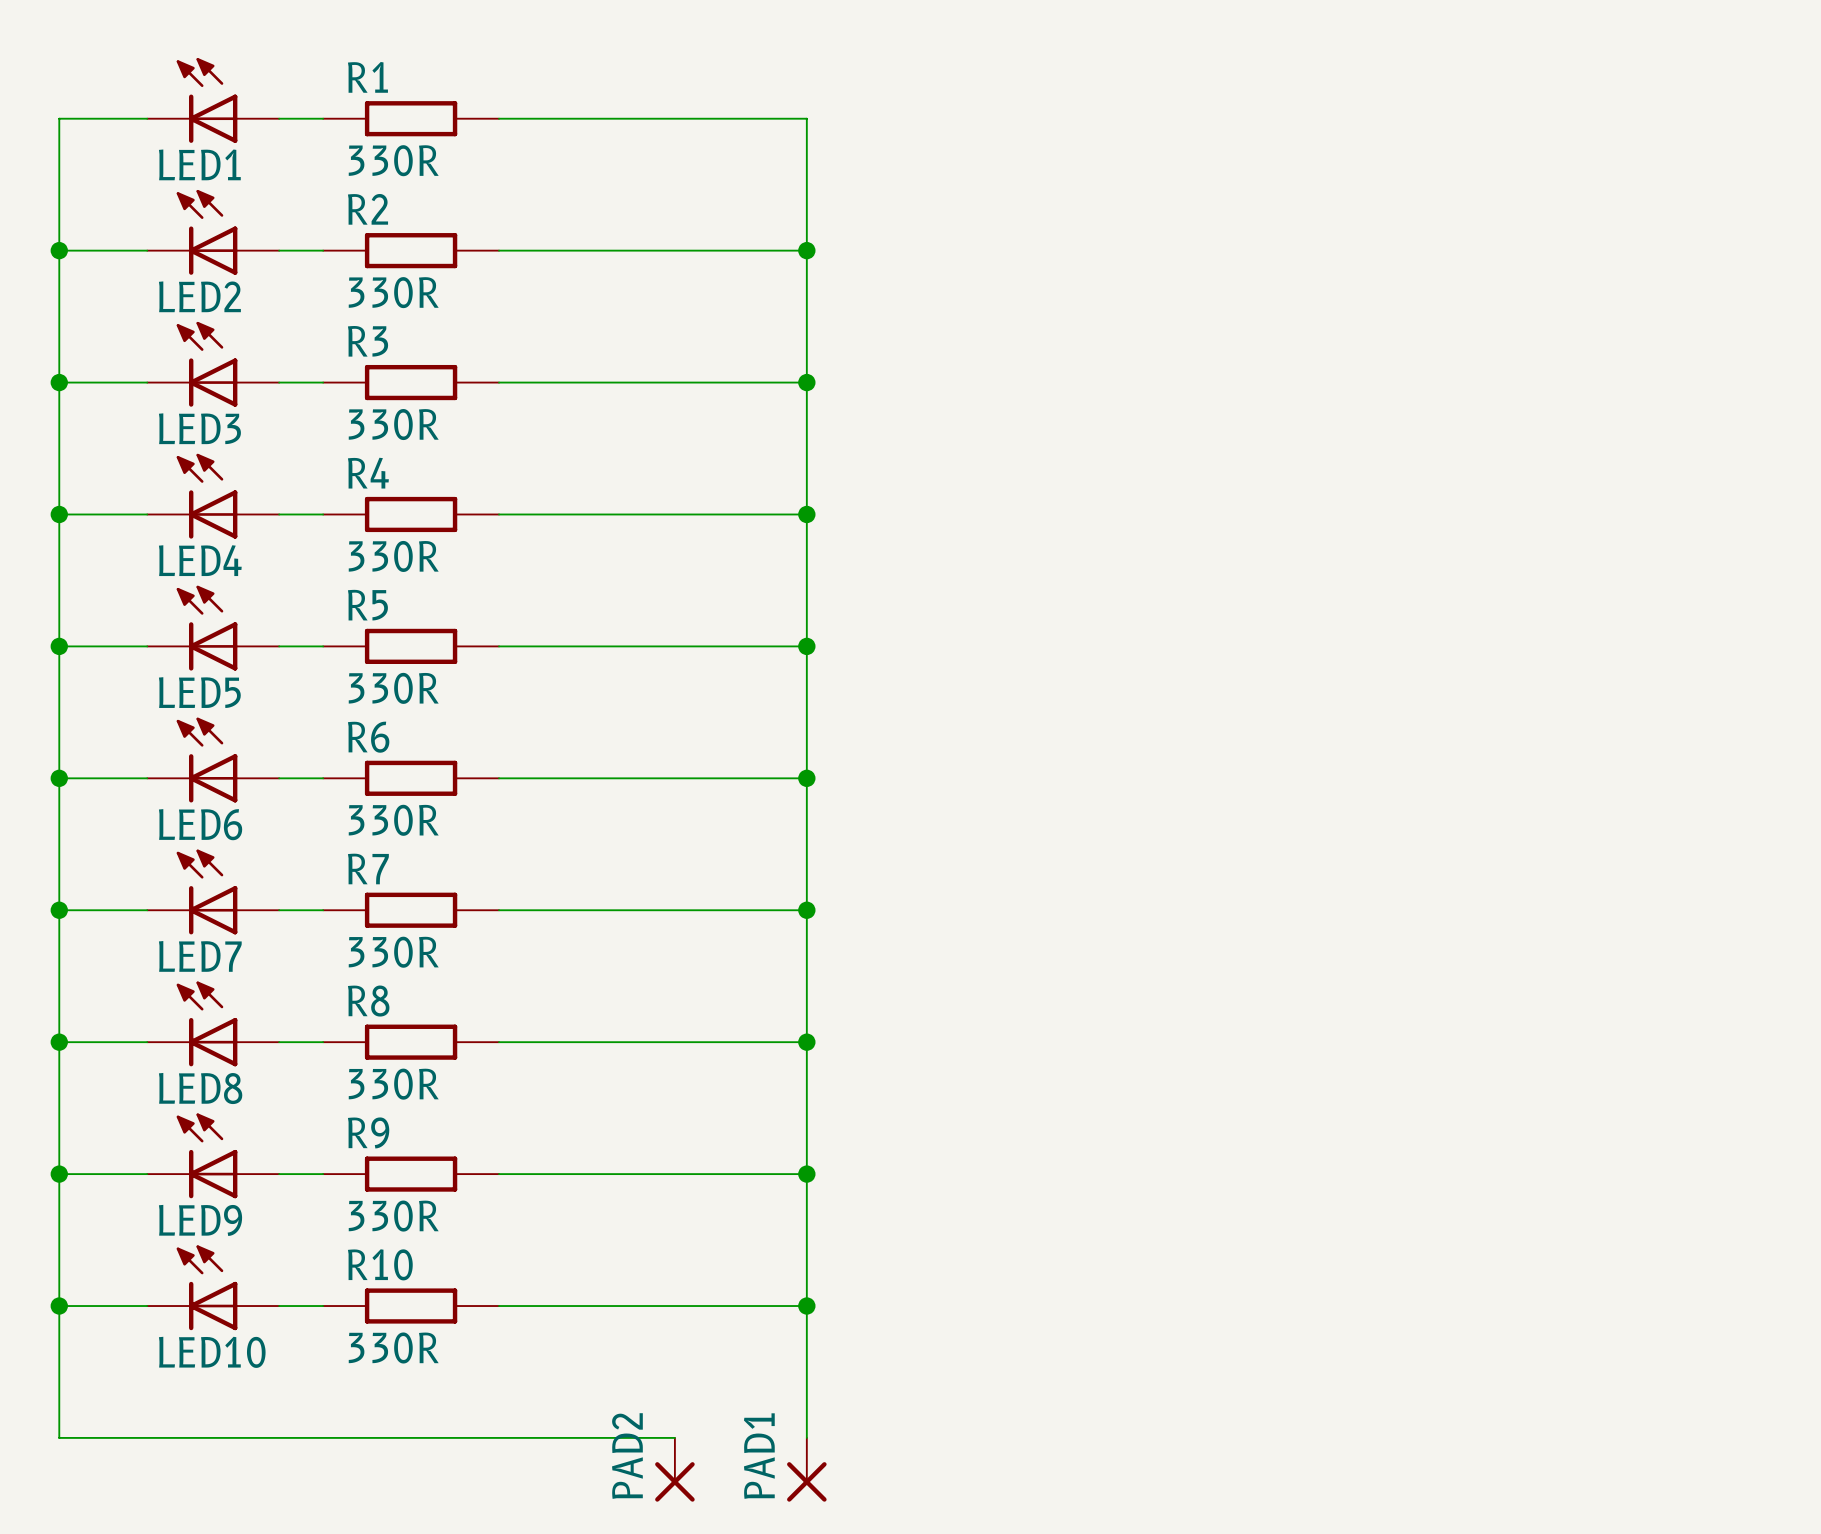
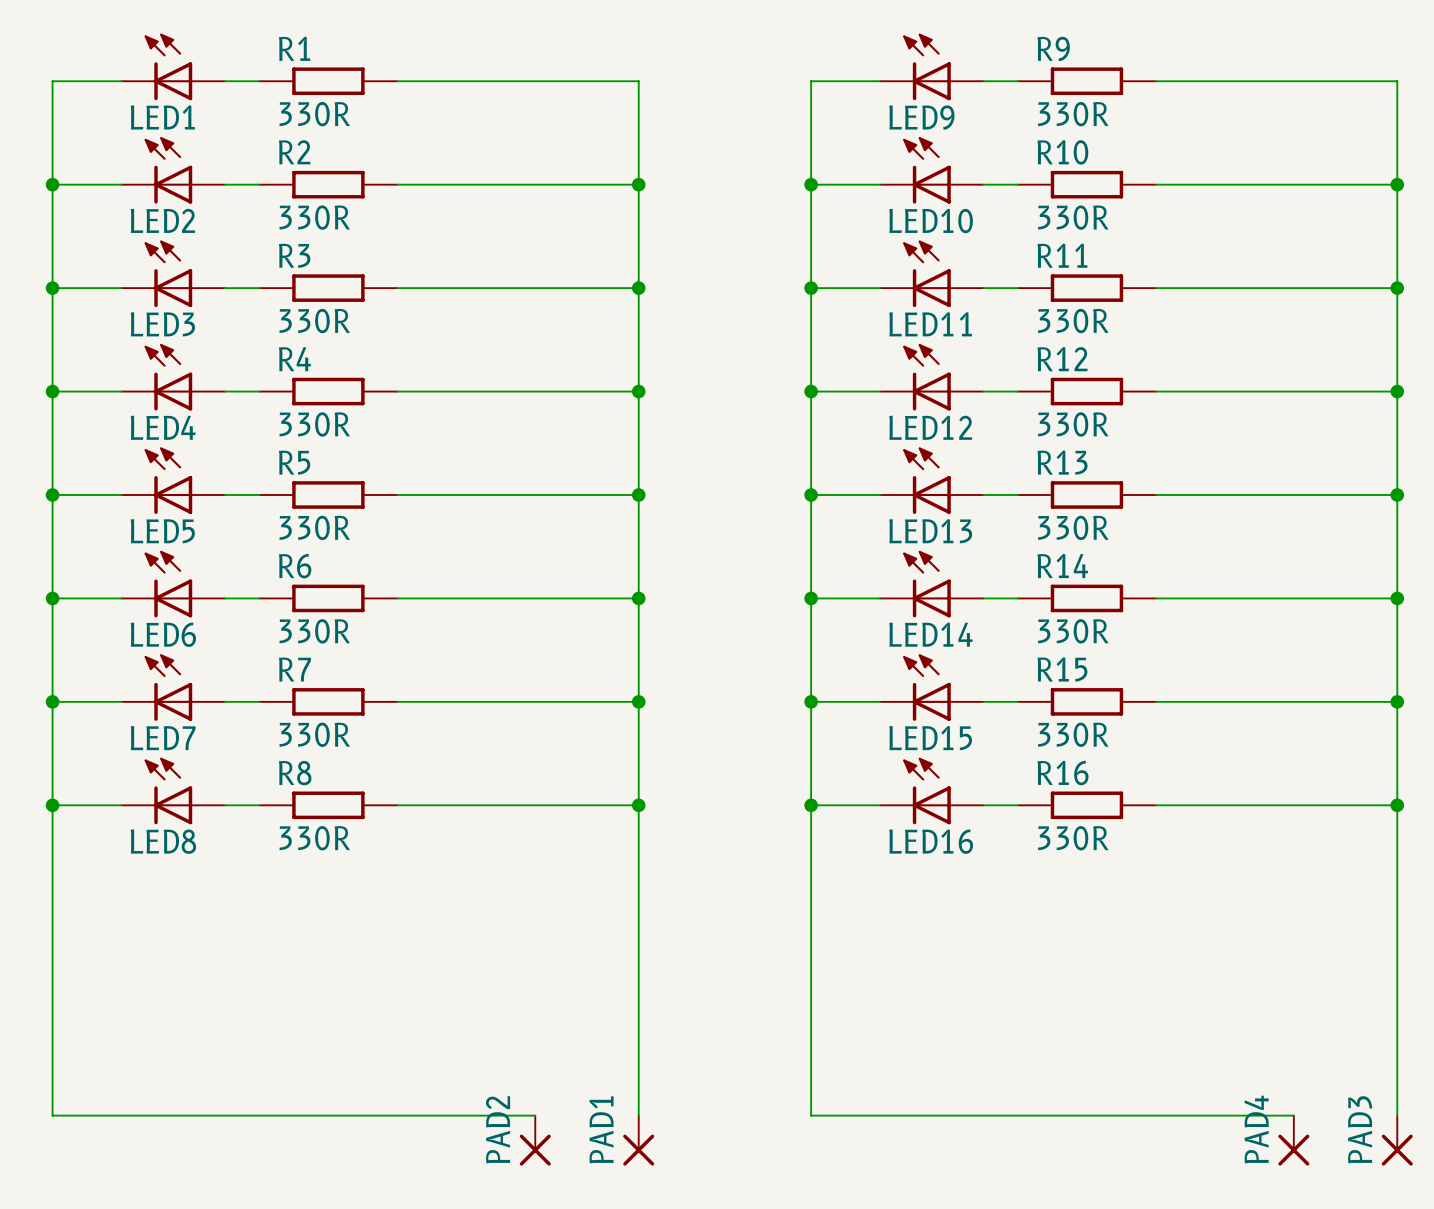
wire: none -> (880, 81) (811, 81) (811, 1115) (1293, 1115)
wire: none -> (983, 81) (1017, 81)
wire: none -> (1155, 81) (1397, 81) (1397, 1115)
wire: none -> (811, 184) (880, 184)
junction: none -> (811, 184)
wire: none -> (983, 184) (1017, 184)
wire: none -> (1155, 184) (1397, 184)
junction: none -> (1397, 184)
LED11: none -> (931, 273)
wire: none -> (811, 288) (880, 288)
junction: none -> (811, 288)
wire: none -> (983, 288) (1017, 288)
R11: none -> 330R (1086, 288)
wire: none -> (1155, 288) (1397, 288)
junction: none -> (1397, 288)
LED12: none -> (931, 377)
wire: none -> (811, 391) (880, 391)
junction: none -> (811, 391)
wire: none -> (983, 391) (1017, 391)
R12: none -> 330R (1086, 391)
wire: none -> (1155, 391) (1397, 391)
junction: none -> (1397, 391)
LED13: none -> (931, 480)
wire: none -> (811, 494) (880, 494)
junction: none -> (811, 494)
wire: none -> (983, 494) (1017, 494)
R13: none -> 330R (1086, 494)
wire: none -> (1155, 494) (1397, 494)
junction: none -> (1397, 494)
LED14: none -> (931, 584)
wire: none -> (811, 598) (880, 598)
junction: none -> (811, 598)
wire: none -> (983, 598) (1017, 598)
R14: none -> 330R (1086, 598)
wire: none -> (1155, 598) (1397, 598)
junction: none -> (1397, 598)
LED15: none -> (931, 687)
wire: none -> (811, 701) (880, 701)
junction: none -> (811, 701)
wire: none -> (983, 701) (1017, 701)
R15: none -> 330R (1086, 701)
wire: none -> (1155, 701) (1397, 701)
junction: none -> (1397, 701)
LED16: none -> (931, 791)
wire: none -> (811, 805) (880, 805)
junction: none -> (811, 805)
wire: none -> (983, 805) (1017, 805)
R16: none -> 330R (1086, 805)
wire: none -> (1155, 805) (1397, 805)
junction: none -> (1397, 805)
LED9 position: (213, 1155) -> (931, 66)
wire: (59, 1174) (147, 1174) -> none
junction: (59, 1174) -> none
wire: (279, 1174) (323, 1174) -> none
R9 position: (411, 1174) -> (1086, 81)
wire: (499, 1174) (806, 1174) -> none
junction: (806, 1174) -> none
LED10 position: (213, 1287) -> (931, 170)
wire: (59, 1306) (147, 1306) -> none
junction: (59, 1306) -> none
wire: (279, 1306) (323, 1306) -> none
R10 position: (411, 1306) -> (1086, 184)
wire: (499, 1306) (806, 1306) -> none
junction: (806, 1306) -> none
PAD4: none -> (1293, 1140)
PAD3: none -> (1397, 1140)

